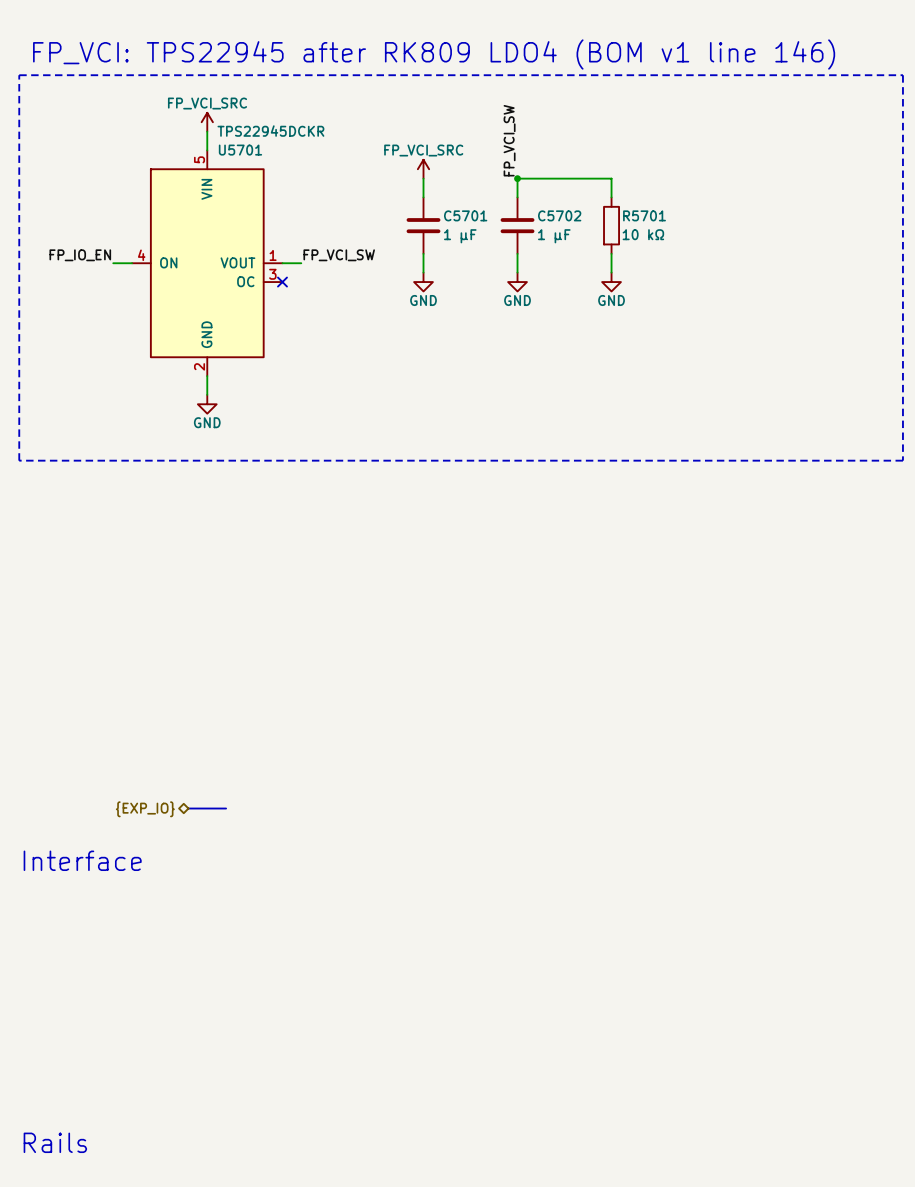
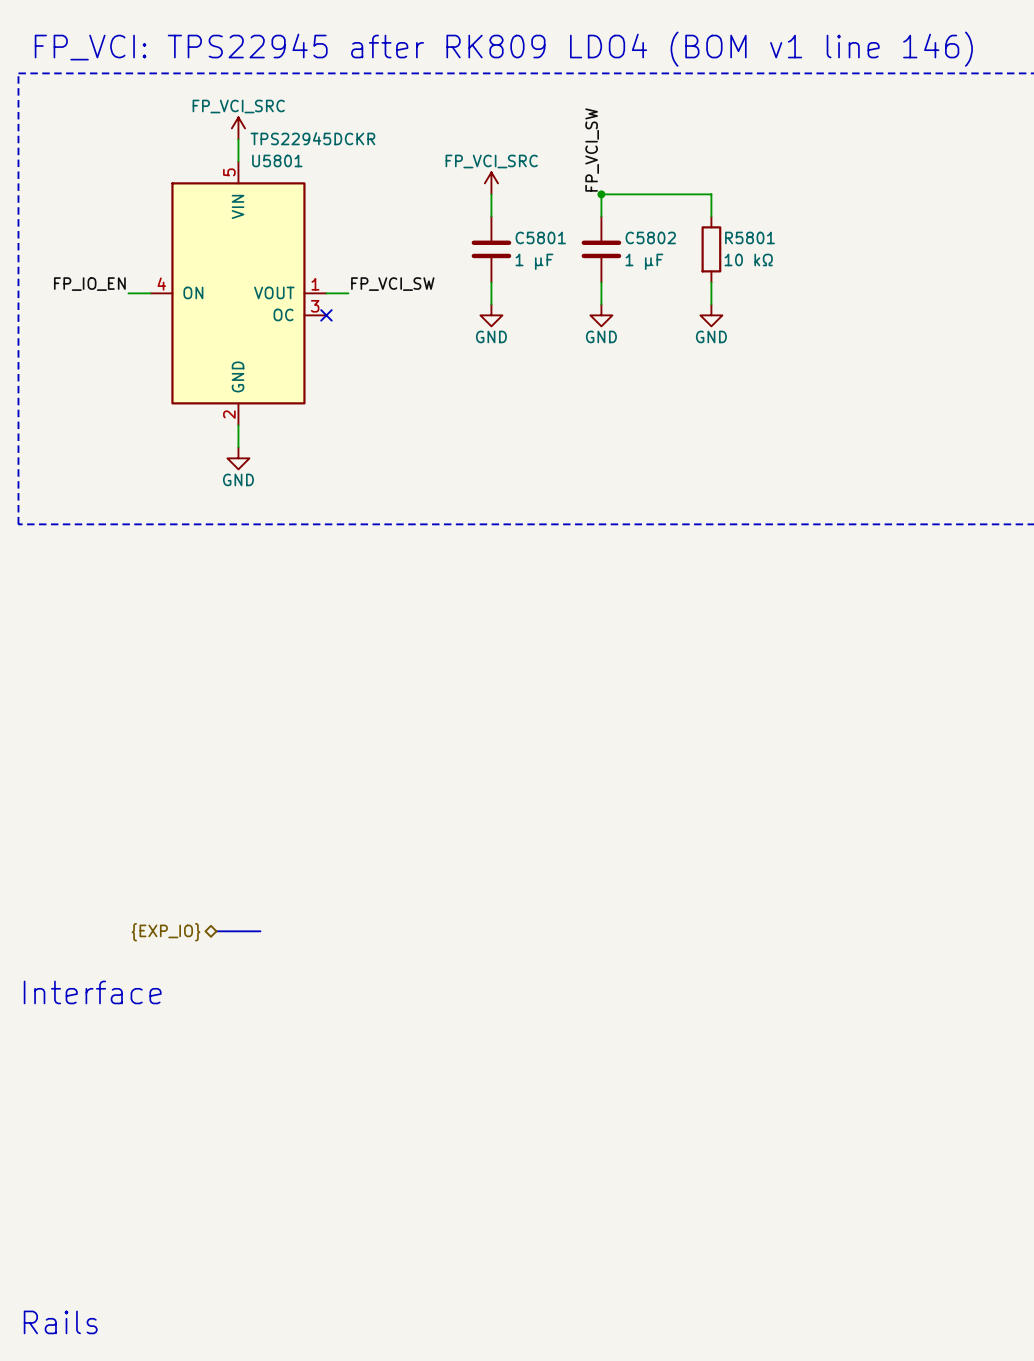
U5701 name: U5701 (240, 150) -> U5801 (277, 160)
C5701 name: C5701 (465, 215) -> C5801 (540, 237)
C5702 name: C5702 (559, 215) -> C5802 (650, 237)
R5701 name: R5701 (644, 215) -> R5801 (749, 237)

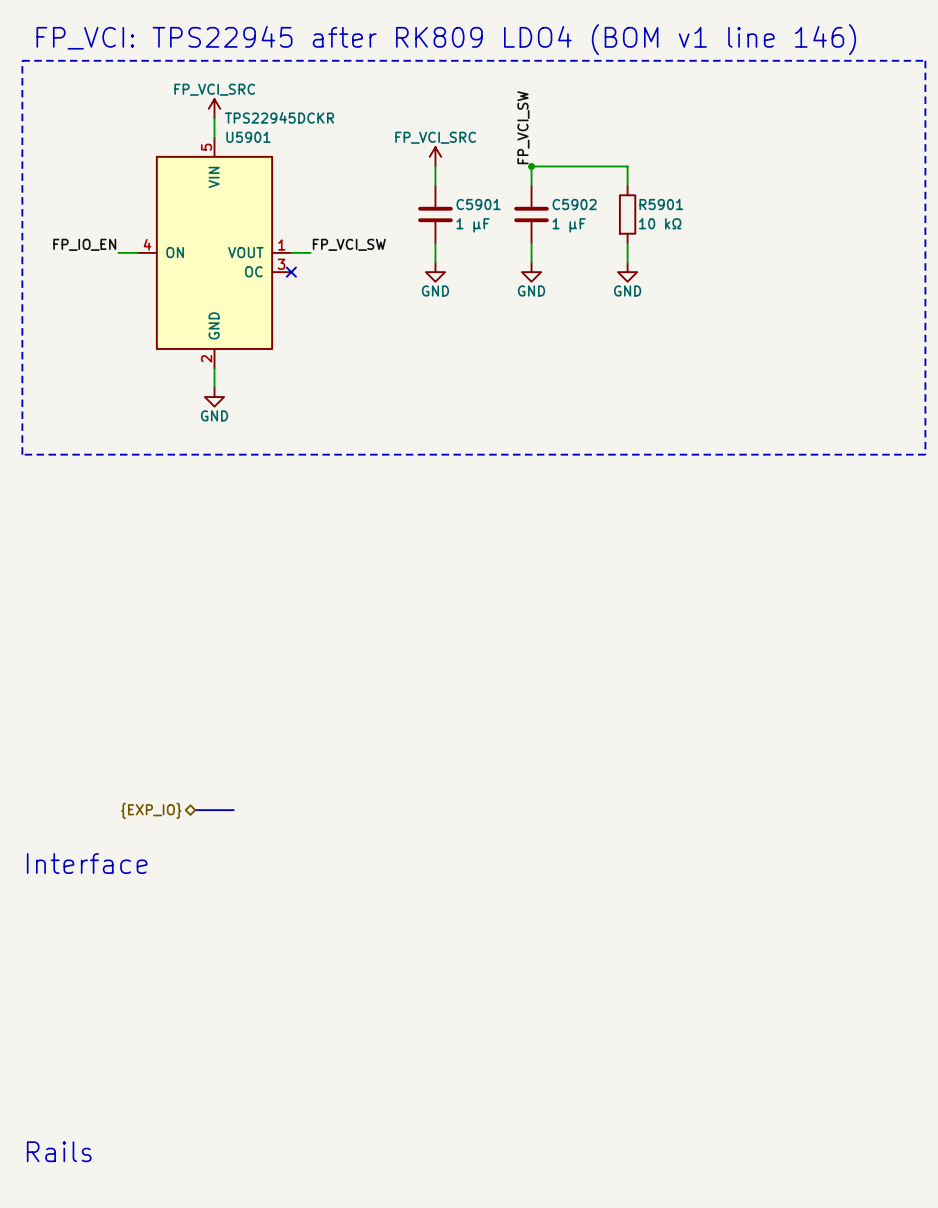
U5801 name: U5801 (277, 160) -> U5901 (248, 137)
C5801 name: C5801 (540, 237) -> C5901 (478, 204)
C5802 name: C5802 (650, 237) -> C5902 (574, 204)
R5801 name: R5801 (749, 237) -> R5901 (661, 204)

